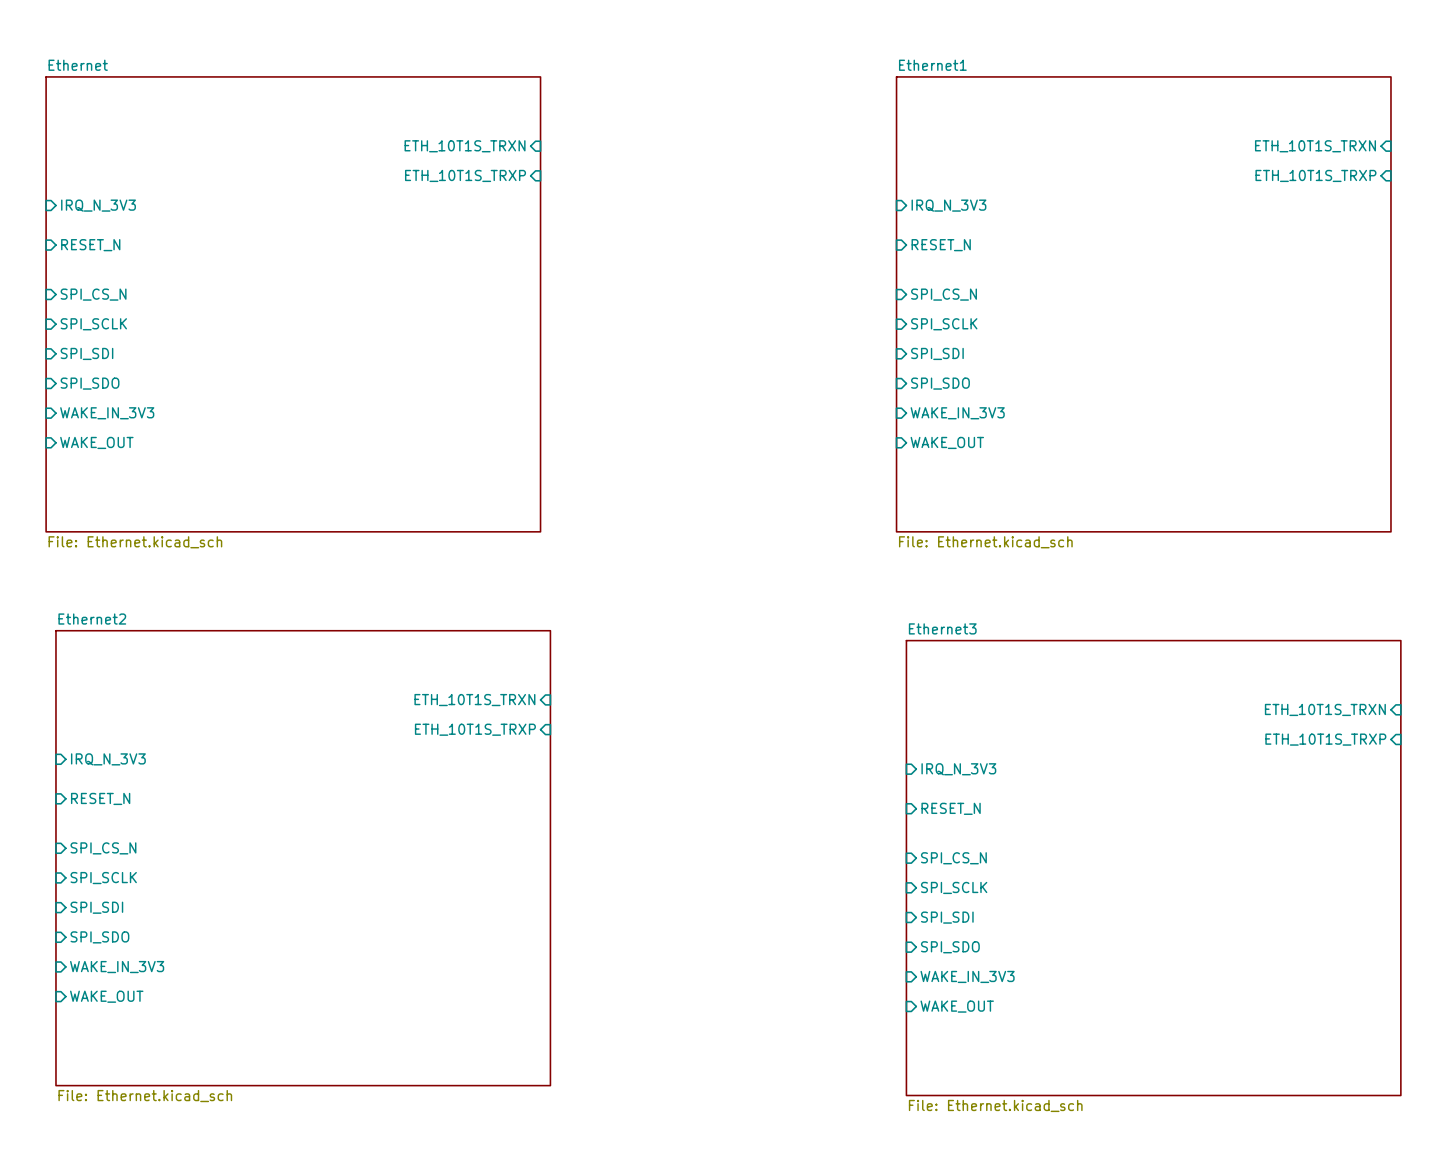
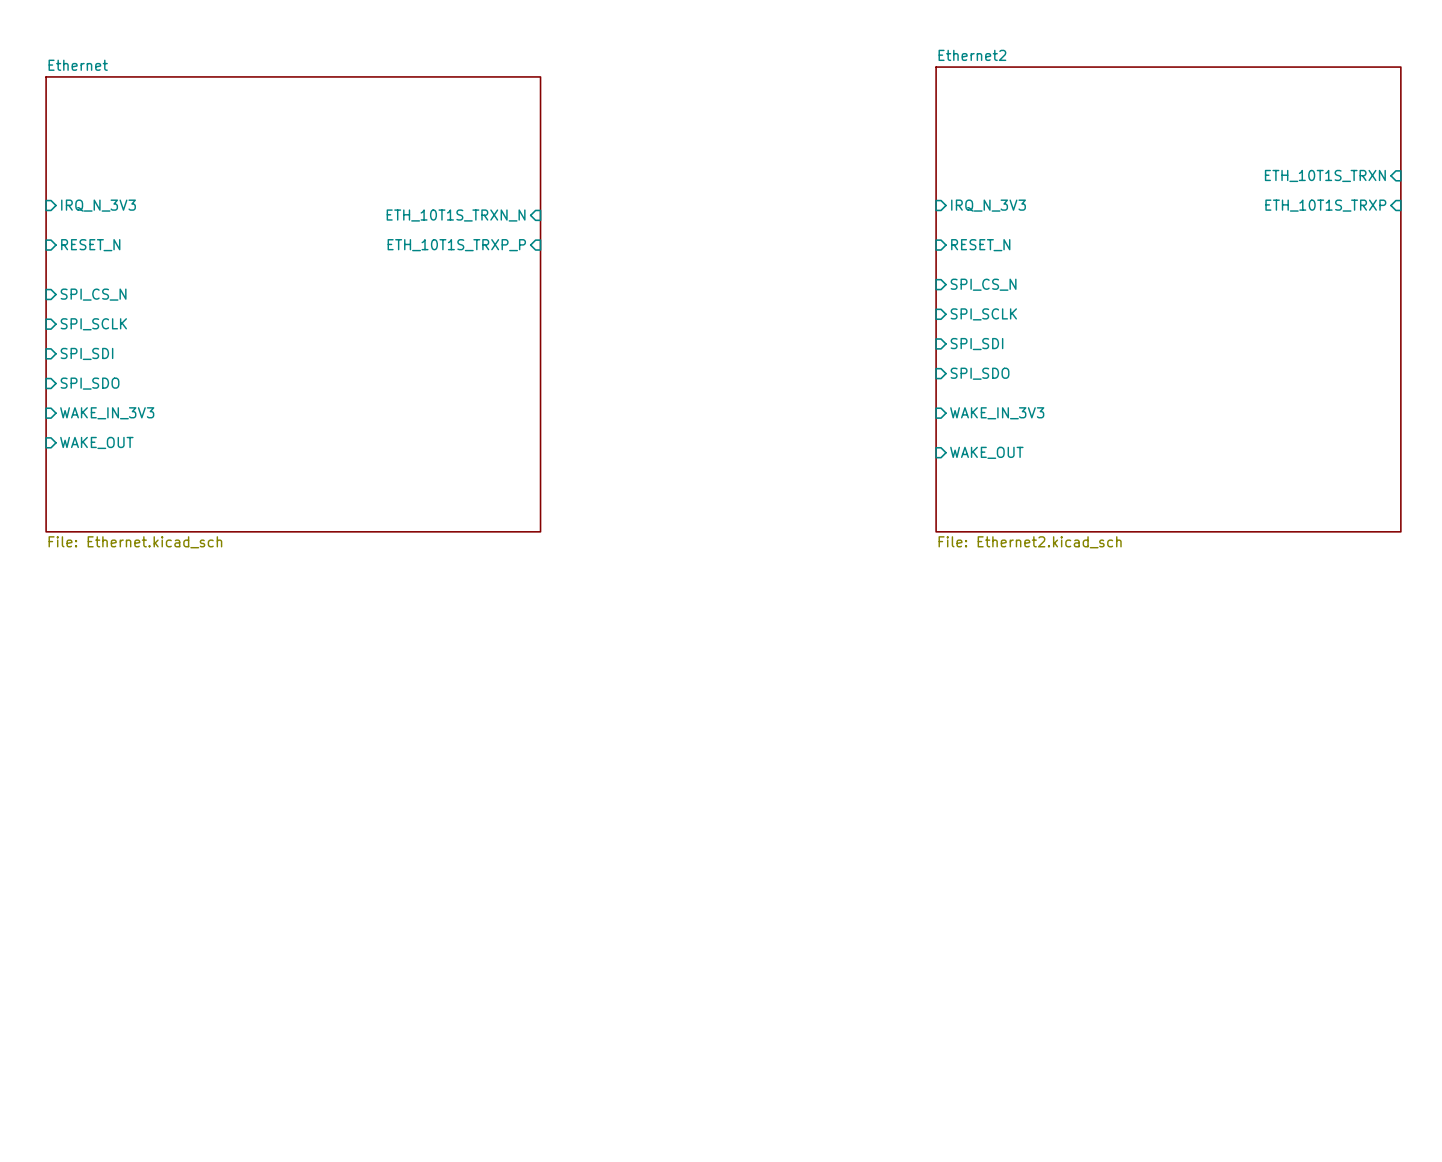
sheet pin: ETH_10T1S_TRXN (465, 146) -> none
sheet pin position: ETH_10T1S_TRXN (1315, 146) -> ETH_10T1S_TRXN (1325, 175)
sheet pin: ETH_10T1S_TRXP (465, 175) -> none
sheet pin position: ETH_10T1S_TRXP (1315, 175) -> ETH_10T1S_TRXP (1325, 205)
sheet pin position: IRQ_N_3V3 (948, 205) -> IRQ_N_3V3 (988, 205)
sheet pin: none -> ETH_10T1S_TRXN_N (456, 215)
sheet pin: none -> ETH_10T1S_TRXP_P (456, 245)
sheet pin position: RESET_N (941, 245) -> RESET_N (980, 245)
sheet pin position: SPI_CS_N (944, 294) -> SPI_CS_N (983, 284)
sheet Ethernet1: File: Ethernet.kicad_sch (1143, 304) -> none
sheet pin position: SPI_SCLK (944, 324) -> SPI_SCLK (983, 314)
sheet pin position: SPI_SDI (937, 353) -> SPI_SDI (976, 344)
sheet pin position: SPI_SDO (940, 383) -> SPI_SDO (980, 373)
sheet pin position: WAKE_IN_3V3 (957, 413) -> WAKE_IN_3V3 (997, 413)
sheet pin position: WAKE_OUT (947, 442) -> WAKE_OUT (986, 452)
sheet Ethernet2 name position: Ethernet2 (92, 619) -> Ethernet2 (972, 55)
sheet Ethernet2 shape: [55, 630, 552, 1087] -> [935, 66, 1402, 533]
sheet pin: ETH_10T1S_TRXN (474, 700) -> none
sheet pin: ETH_10T1S_TRXN (1325, 709) -> none
sheet pin: ETH_10T1S_TRXP (475, 729) -> none
sheet pin: ETH_10T1S_TRXP (1325, 739) -> none
sheet pin: IRQ_N_3V3 (108, 759) -> none
sheet pin: IRQ_N_3V3 (958, 769) -> none
sheet pin: RESET_N (100, 798) -> none
sheet pin: RESET_N (951, 808) -> none
sheet pin: SPI_CS_N (103, 848) -> none
sheet pin: SPI_CS_N (953, 858) -> none
sheet Ethernet3: File: Ethernet.kicad_sch (1153, 868) -> none
sheet pin: SPI_SCLK (103, 878) -> none
sheet pin: SPI_SCLK (954, 887) -> none
sheet pin: SPI_SDI (96, 907) -> none
sheet pin: SPI_SDI (947, 917) -> none
sheet pin: SPI_SDO (99, 937) -> none
sheet pin: SPI_SDO (950, 947) -> none
sheet pin: WAKE_IN_3V3 (117, 967) -> none
sheet pin: WAKE_IN_3V3 (967, 976) -> none
sheet pin: WAKE_OUT (106, 996) -> none
sheet pin: WAKE_OUT (957, 1006) -> none
sheet Ethernet2 value: File: Ethernet.kicad_sch (145, 1096) -> File: Ethernet2.kicad_sch (1030, 542)

